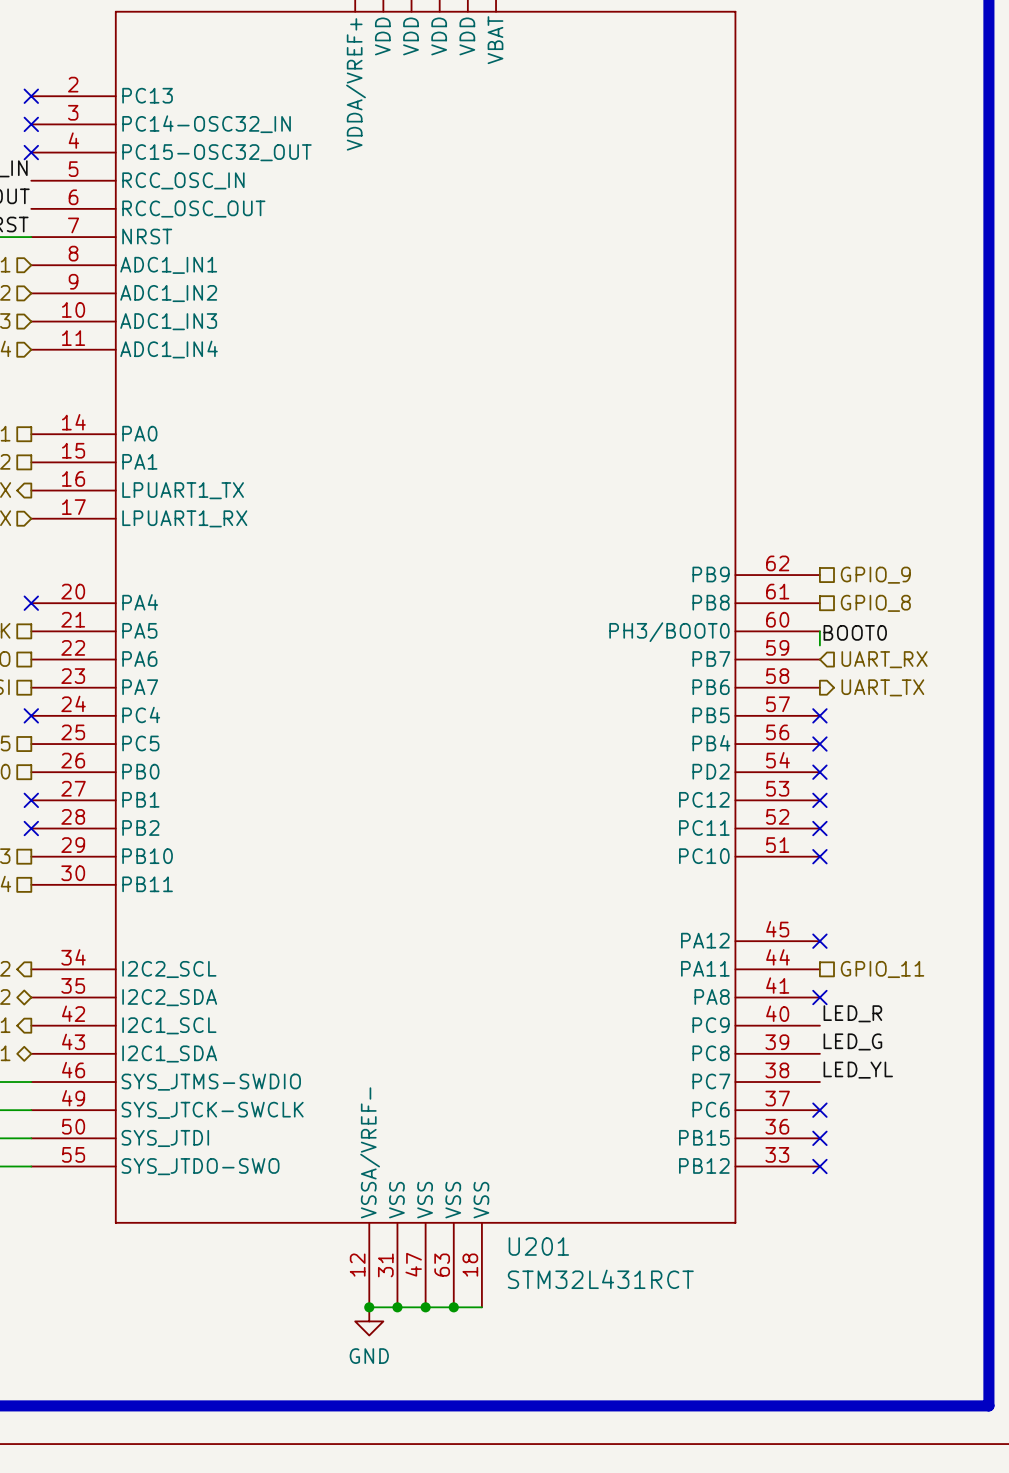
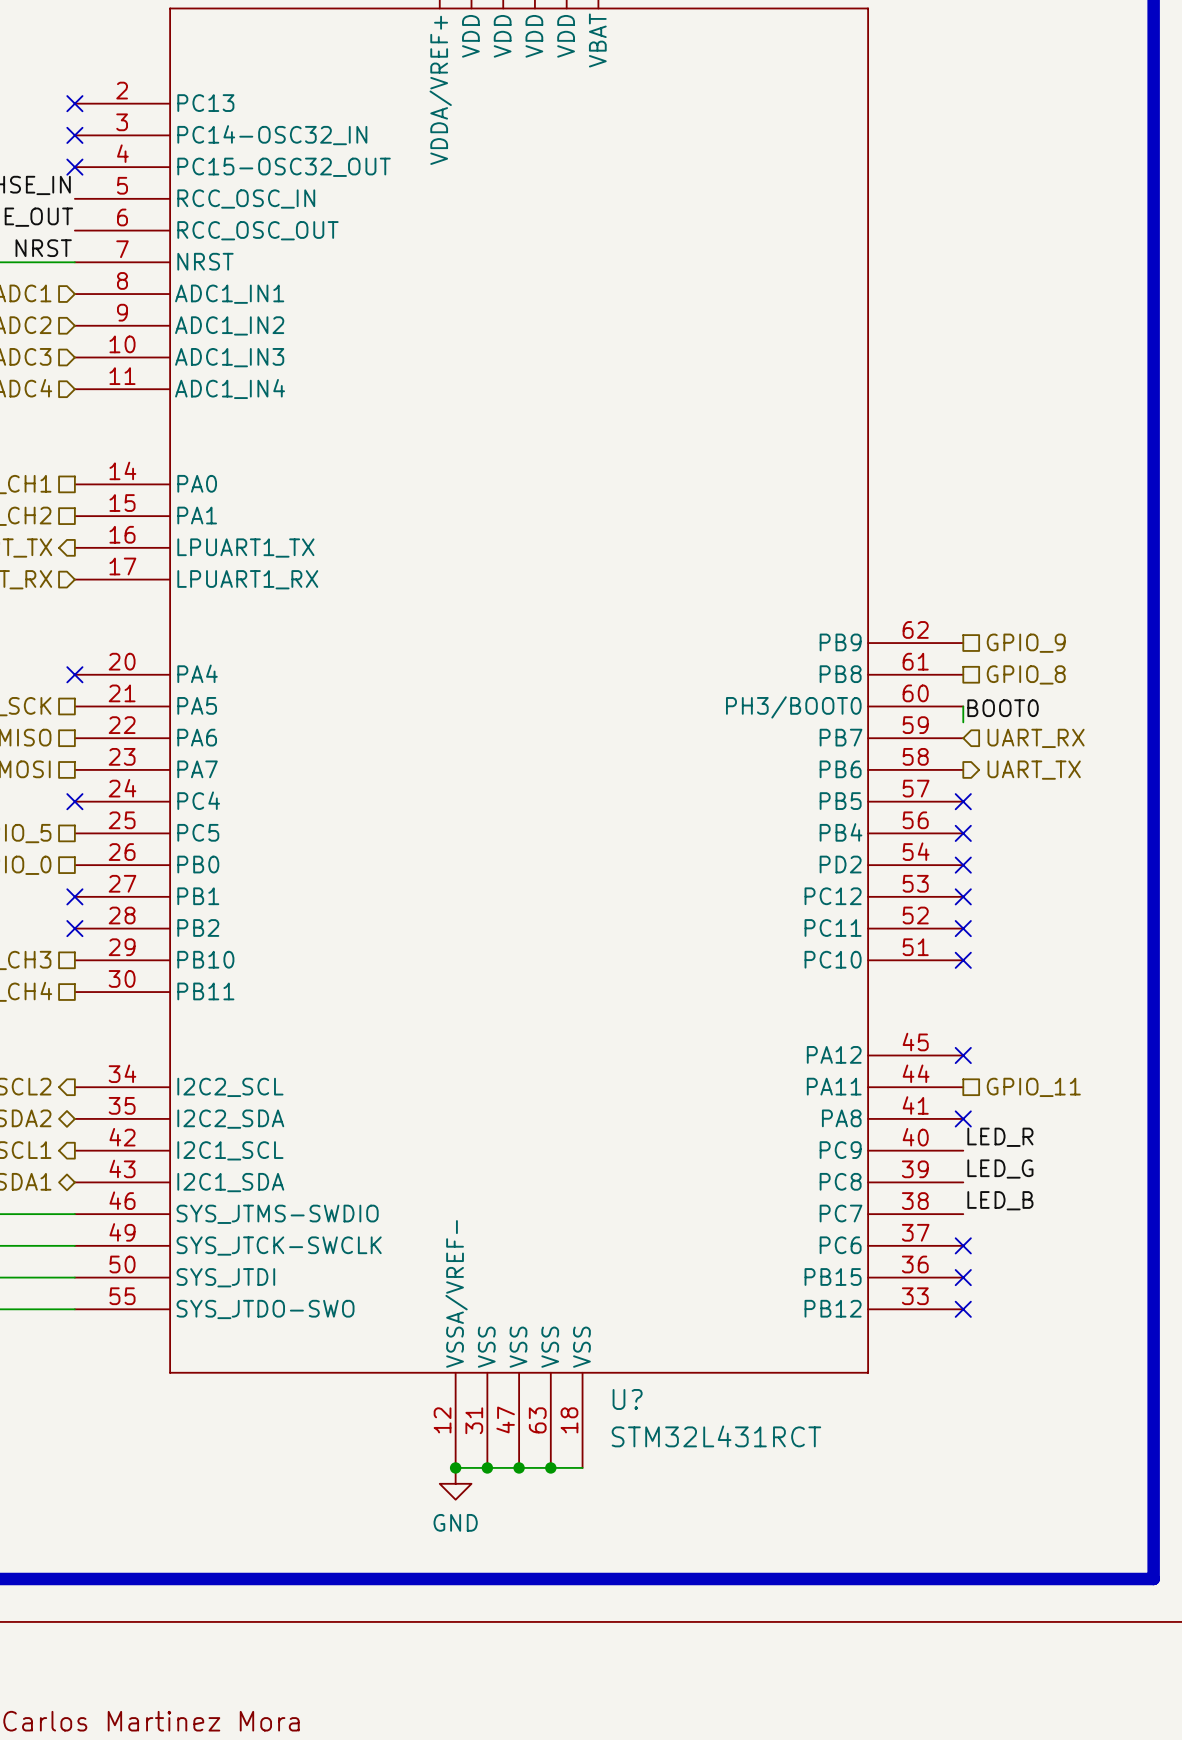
label: LED_YL (858, 1070) -> LED_B (1000, 1200)
U201 name: U201 (538, 1246) -> U? (627, 1399)

